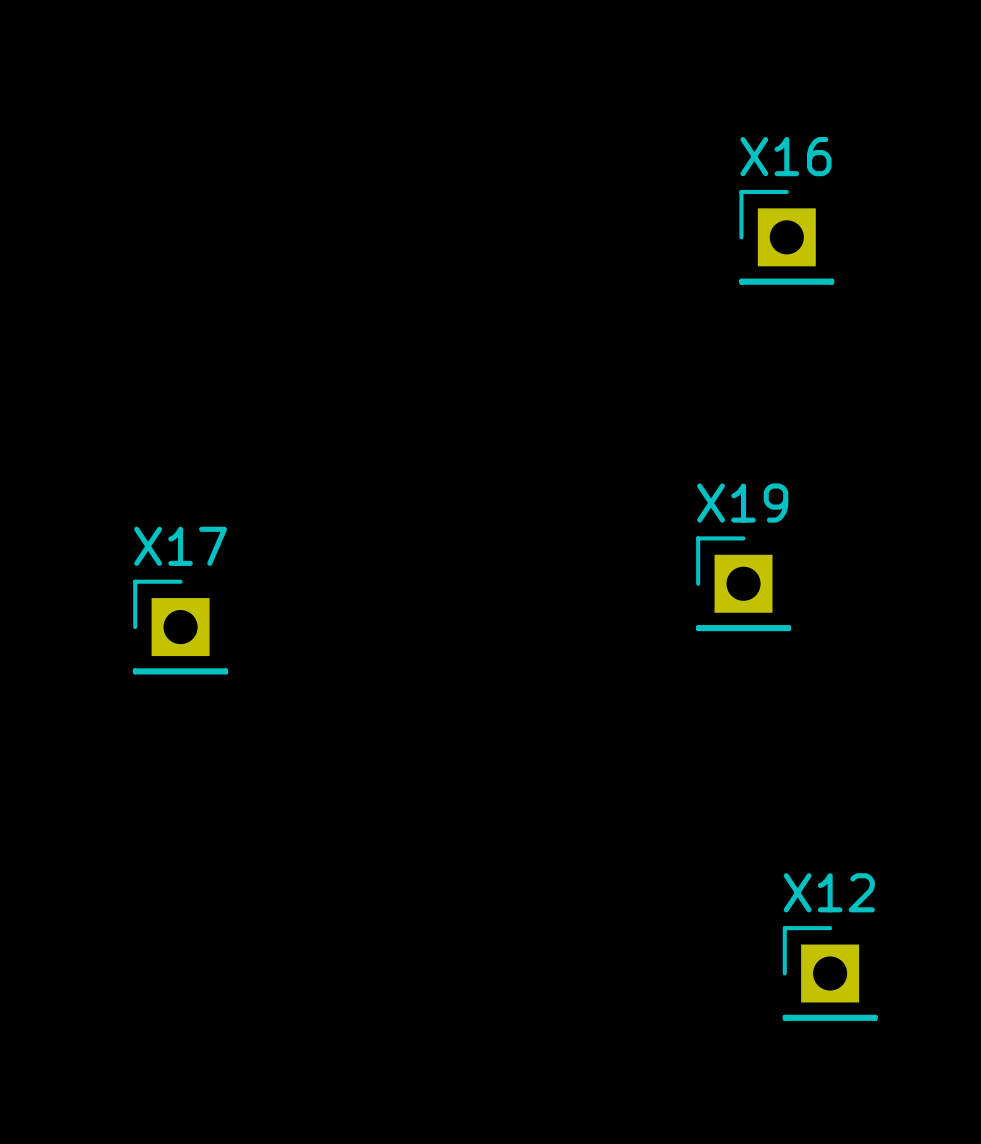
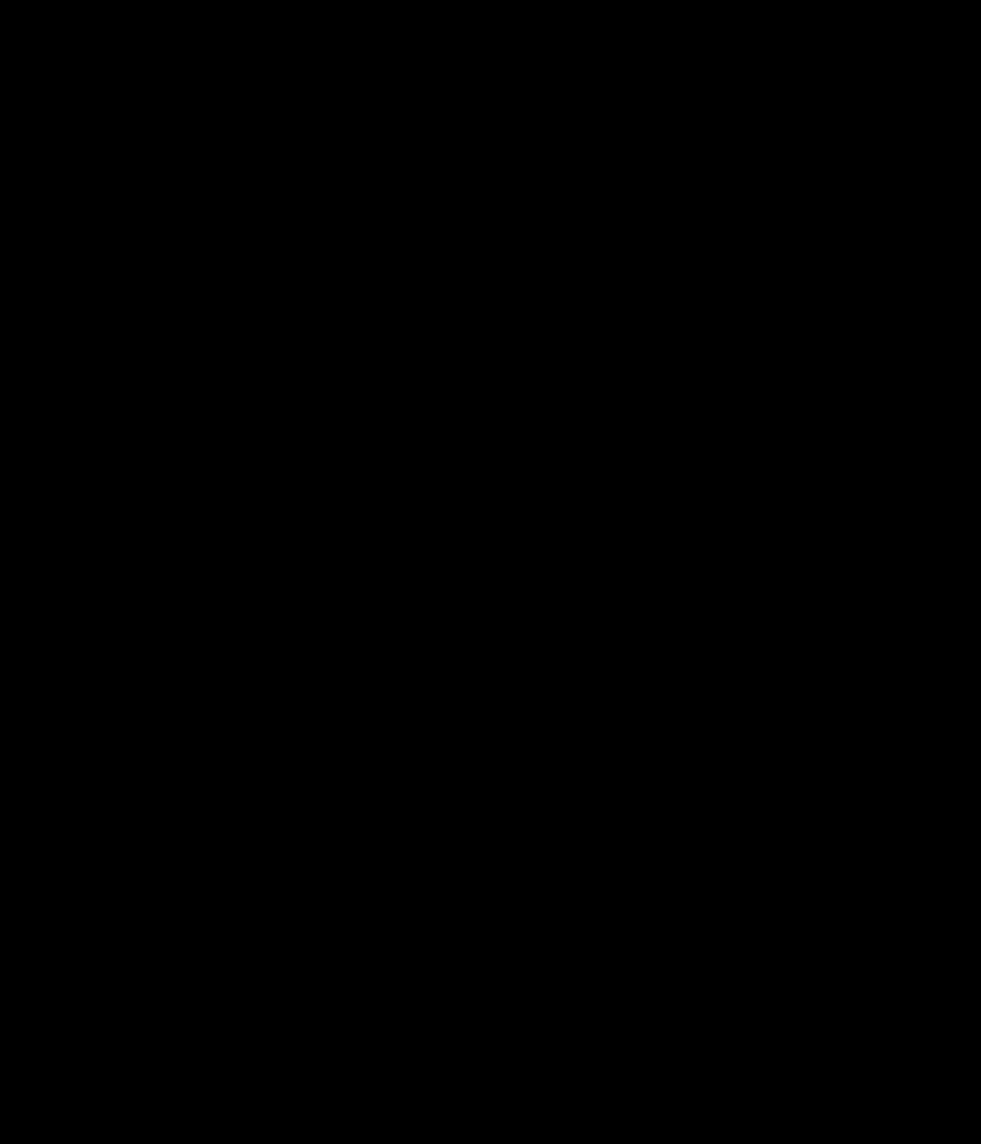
X16: (786, 237) -> none
X19: (743, 583) -> none
X17: (180, 627) -> none
X12: (830, 973) -> none

